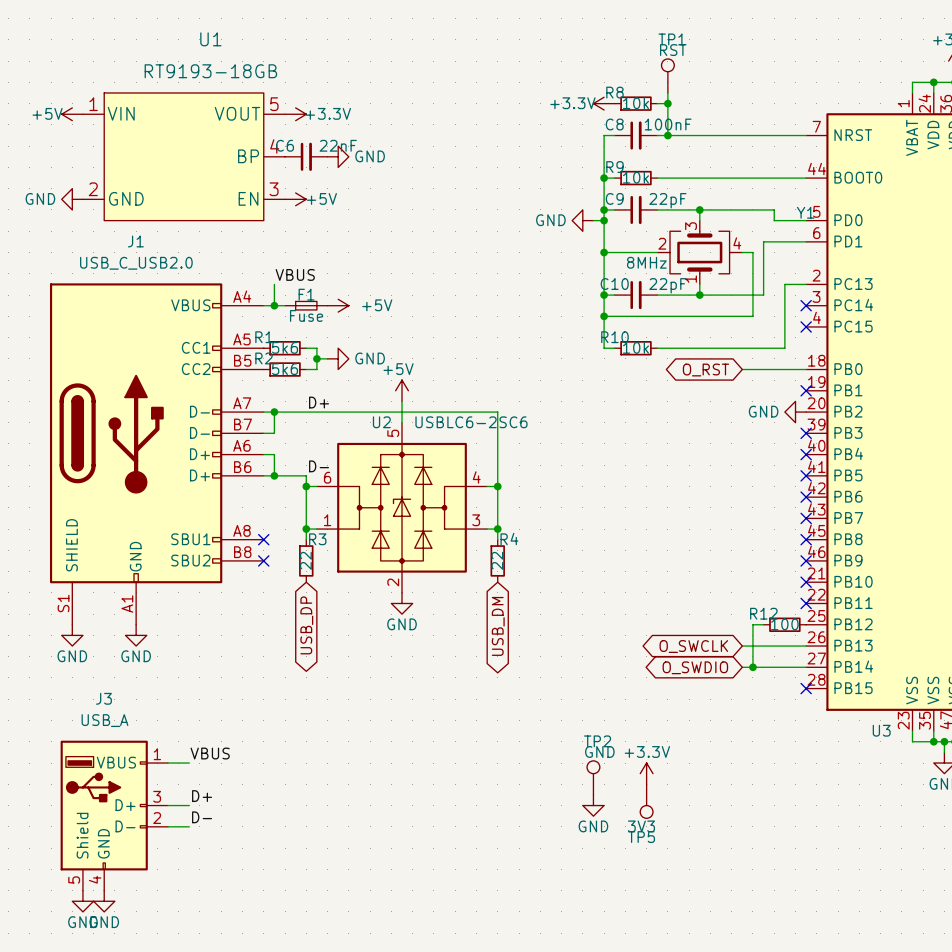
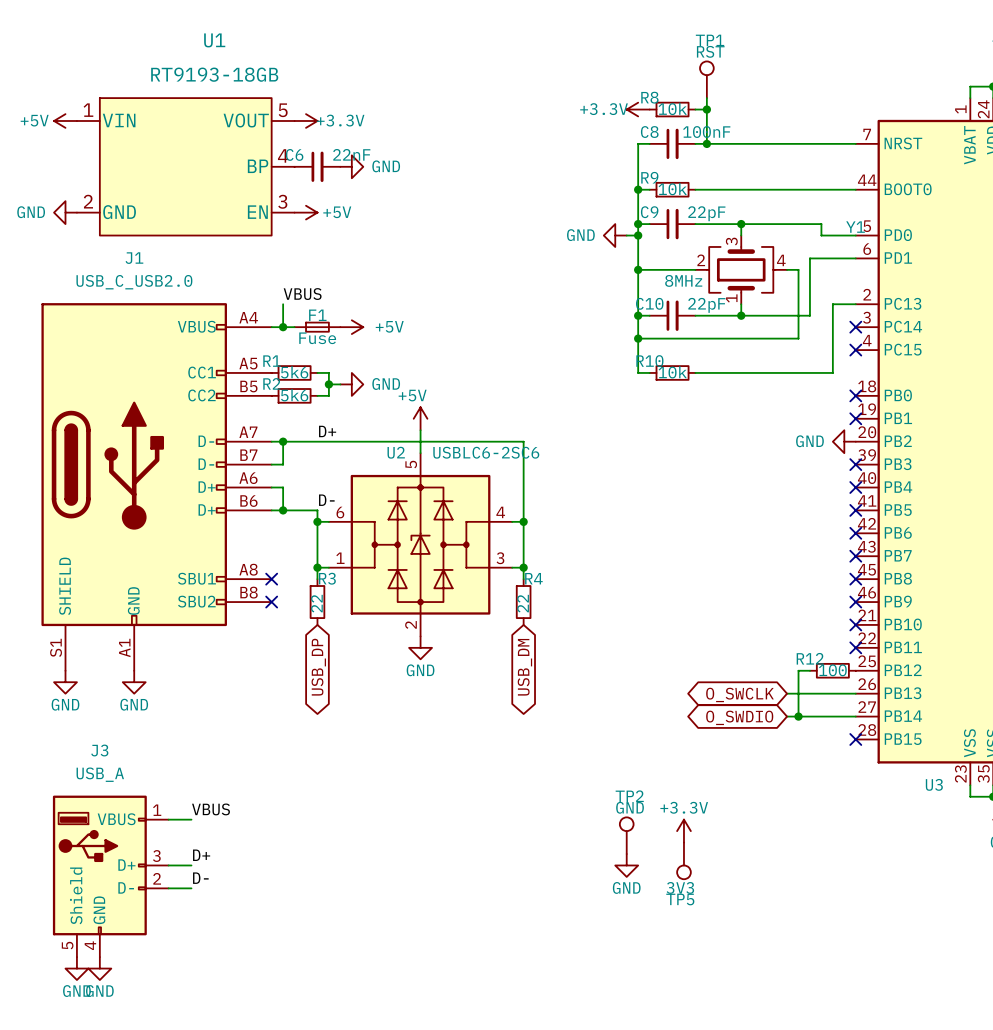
wire: (742, 369) (806, 369) -> none
no-connect mark: none -> (855, 395)
global label: O_RST (705, 370) -> none

